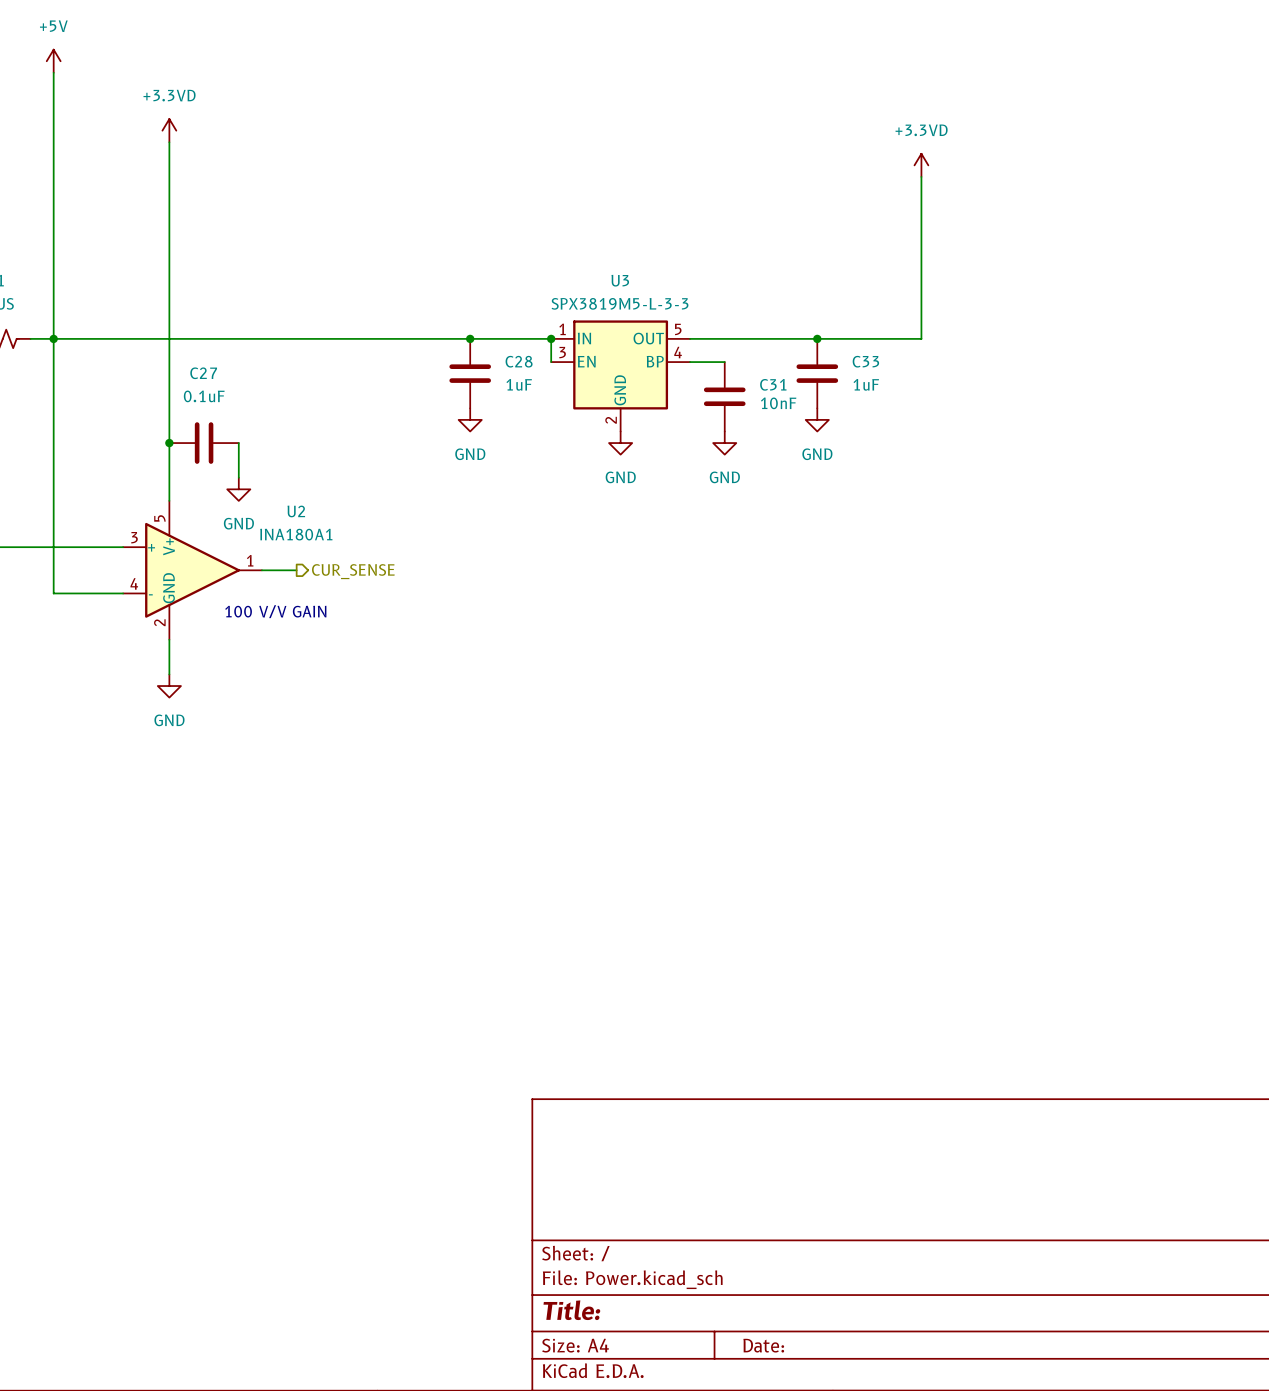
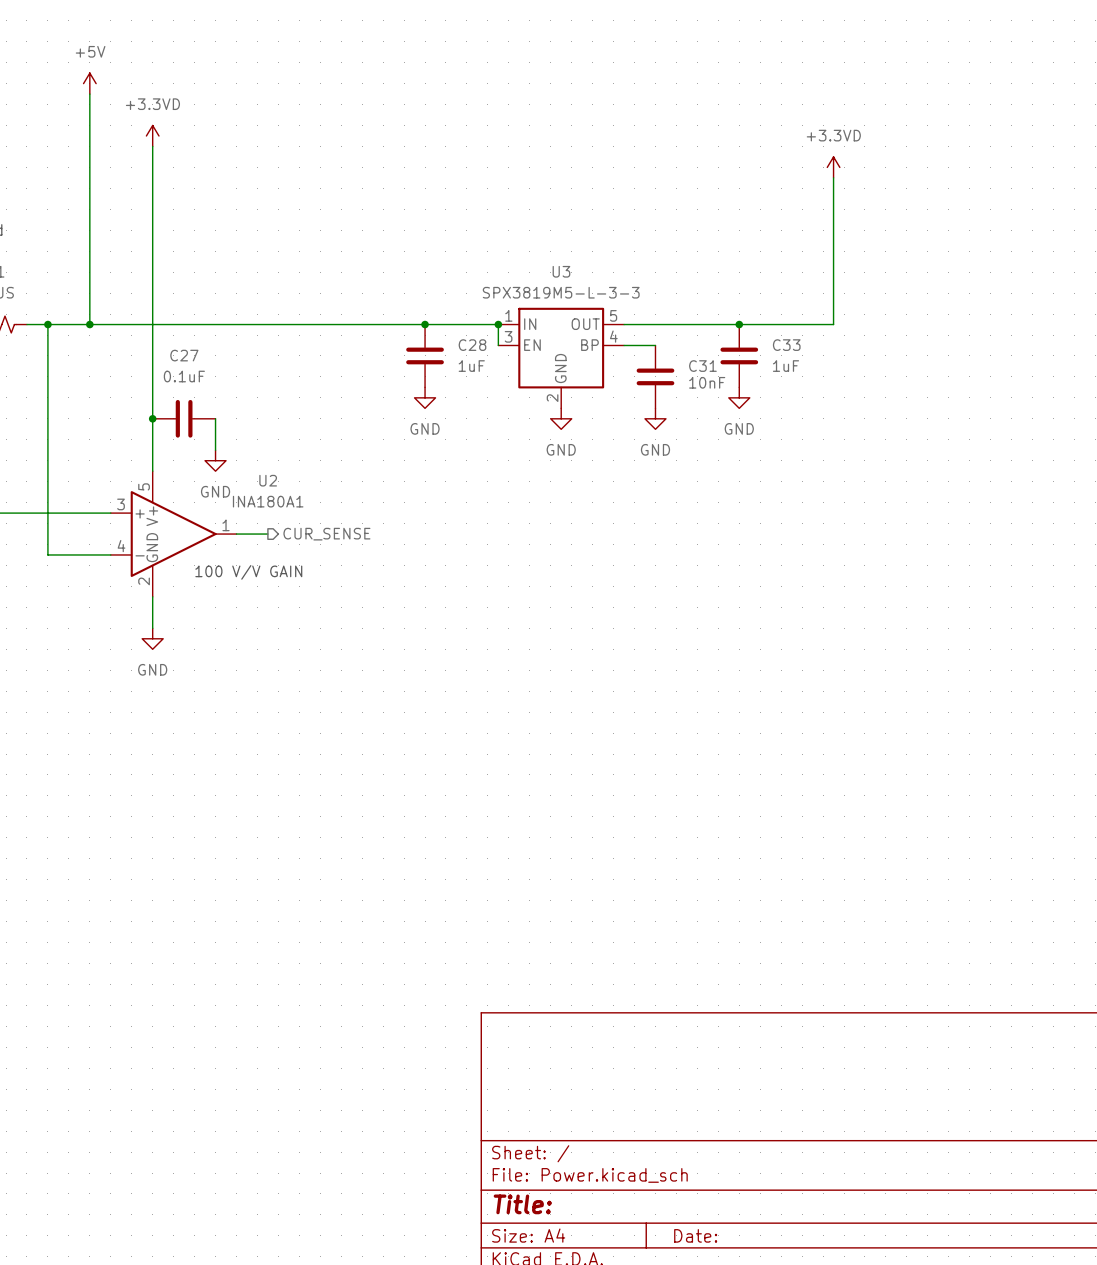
power symbol position: +5V (53, 61) -> +5V (89, 83)
wire: (53, 72) (53, 338) -> none
wire: none -> (89, 94) (89, 324)
junction: none -> (89, 324)

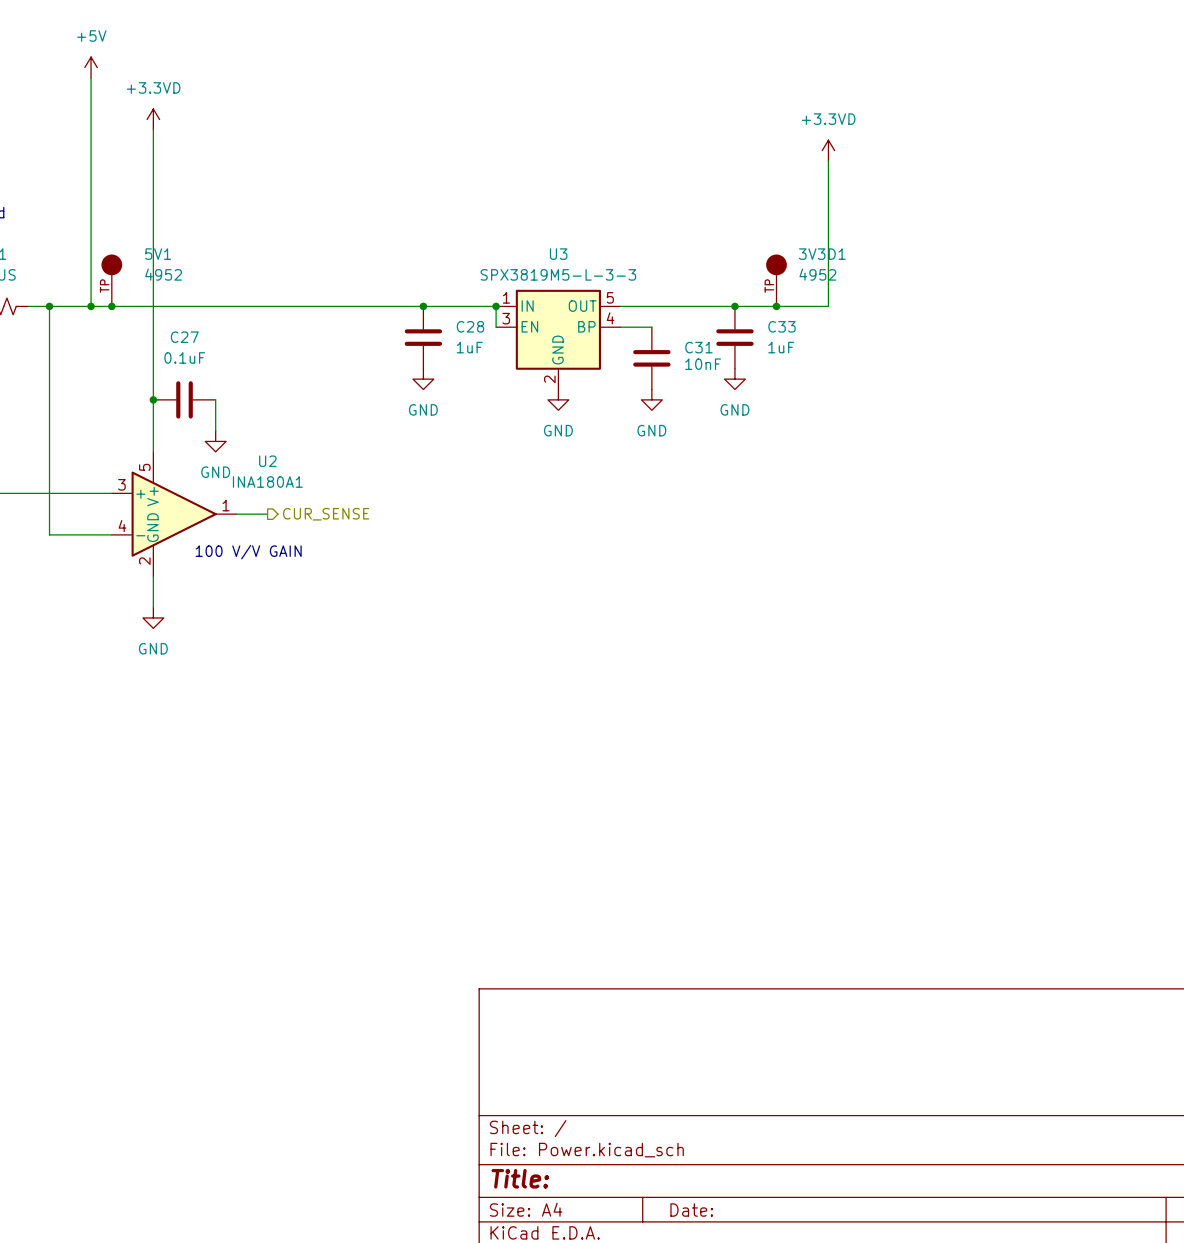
5V1: none -> 4952 (111, 280)
3V3D1: none -> 4952 (776, 280)
junction: none -> (111, 306)
junction: none -> (776, 306)

